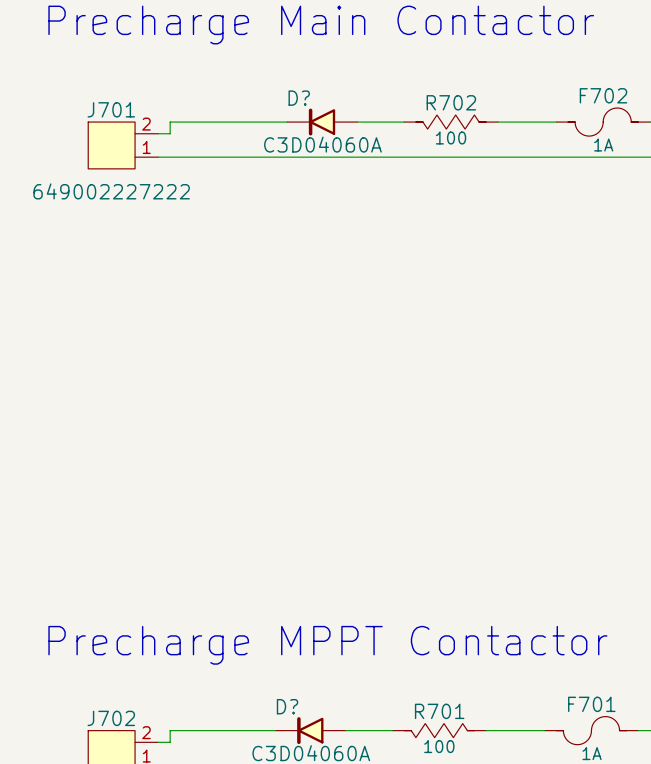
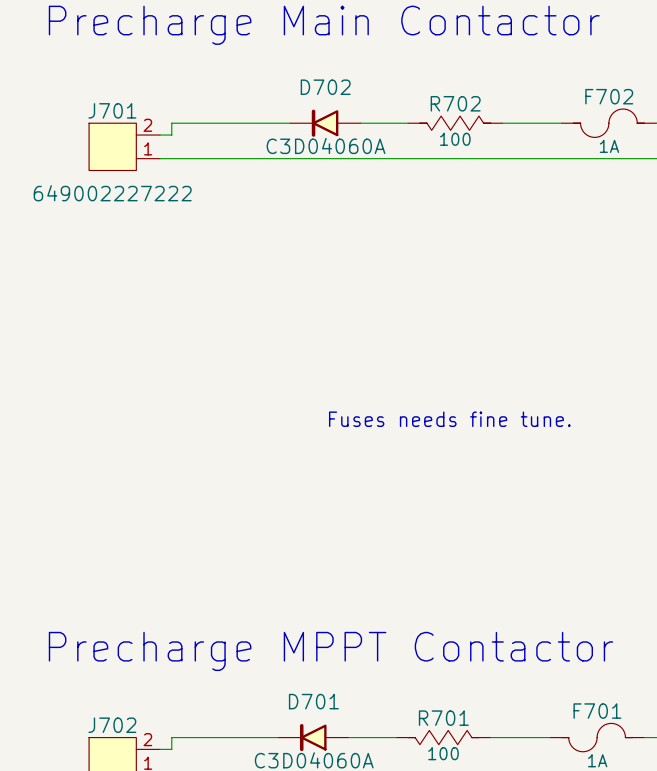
D? name: D? (299, 98) -> D702 (325, 87)
text: none -> Fuses needs fine tune. (449, 419)
D? name: D? (287, 706) -> D701 (313, 701)

